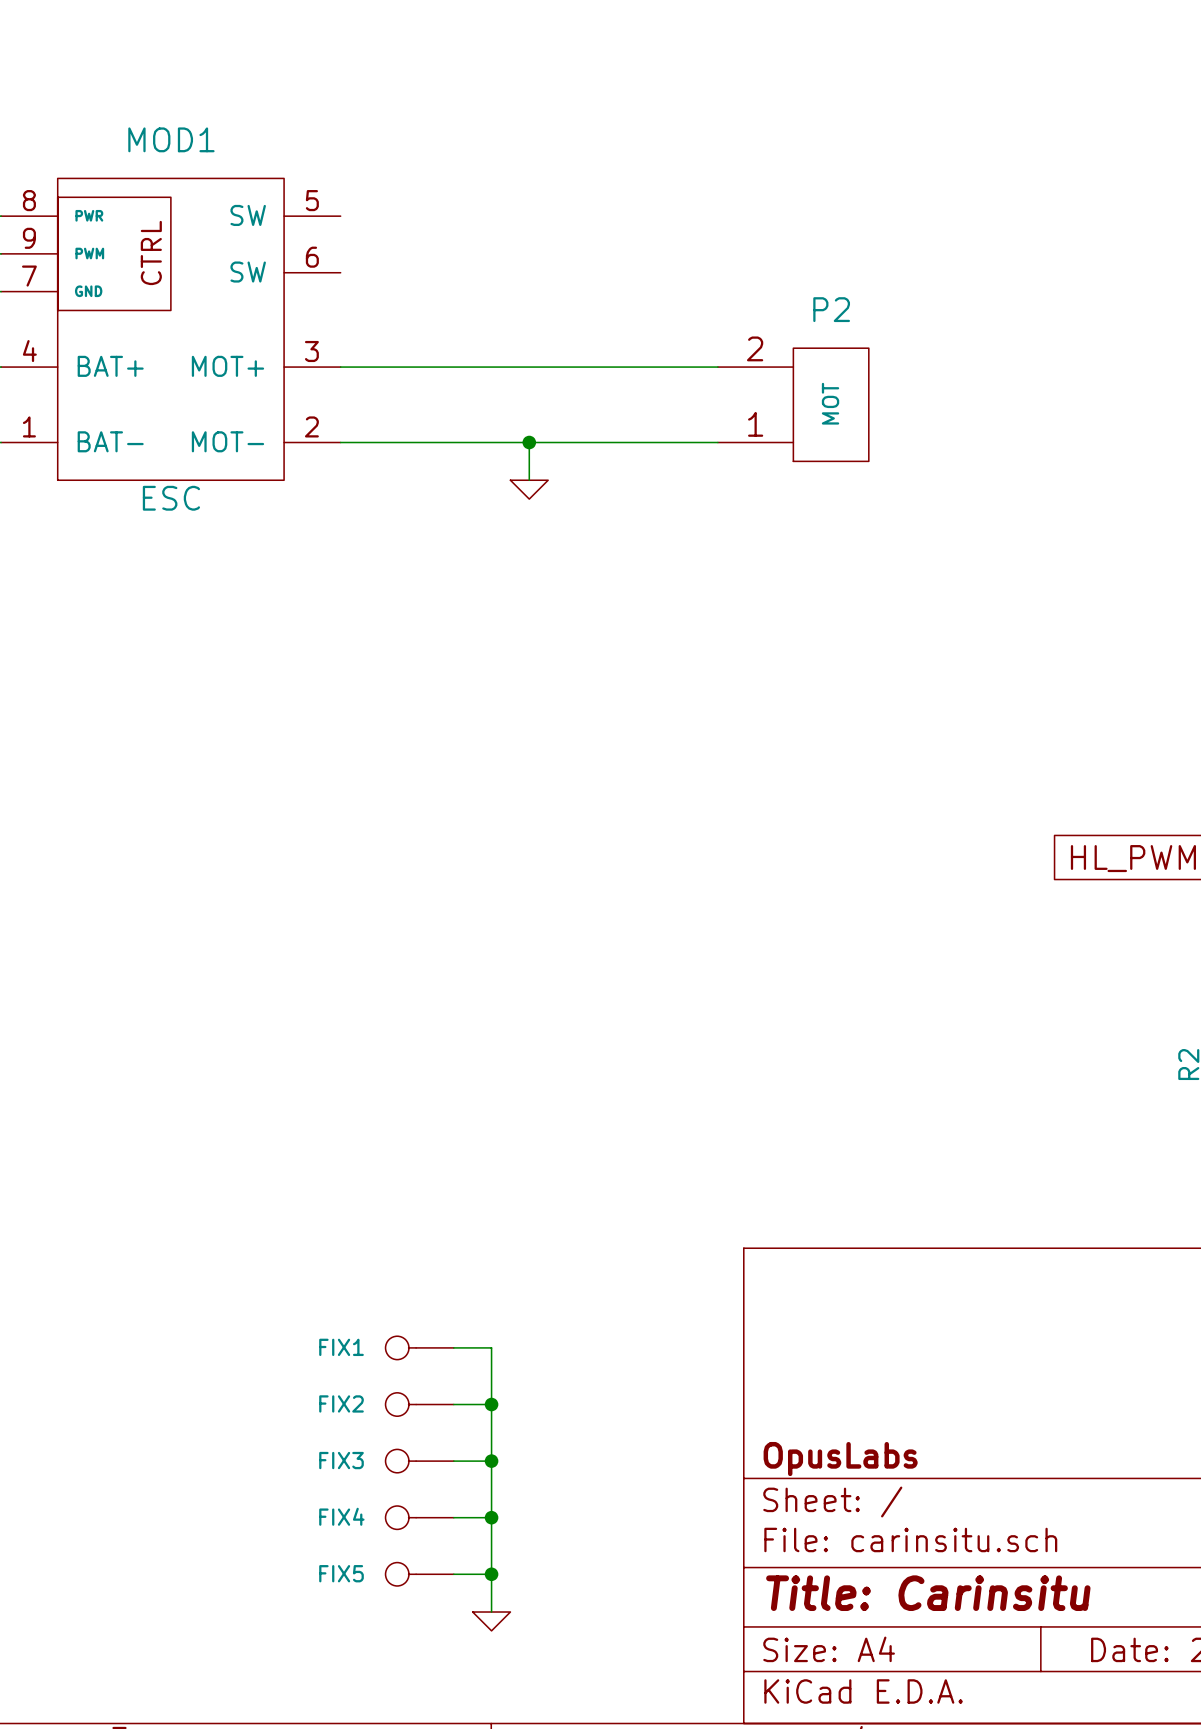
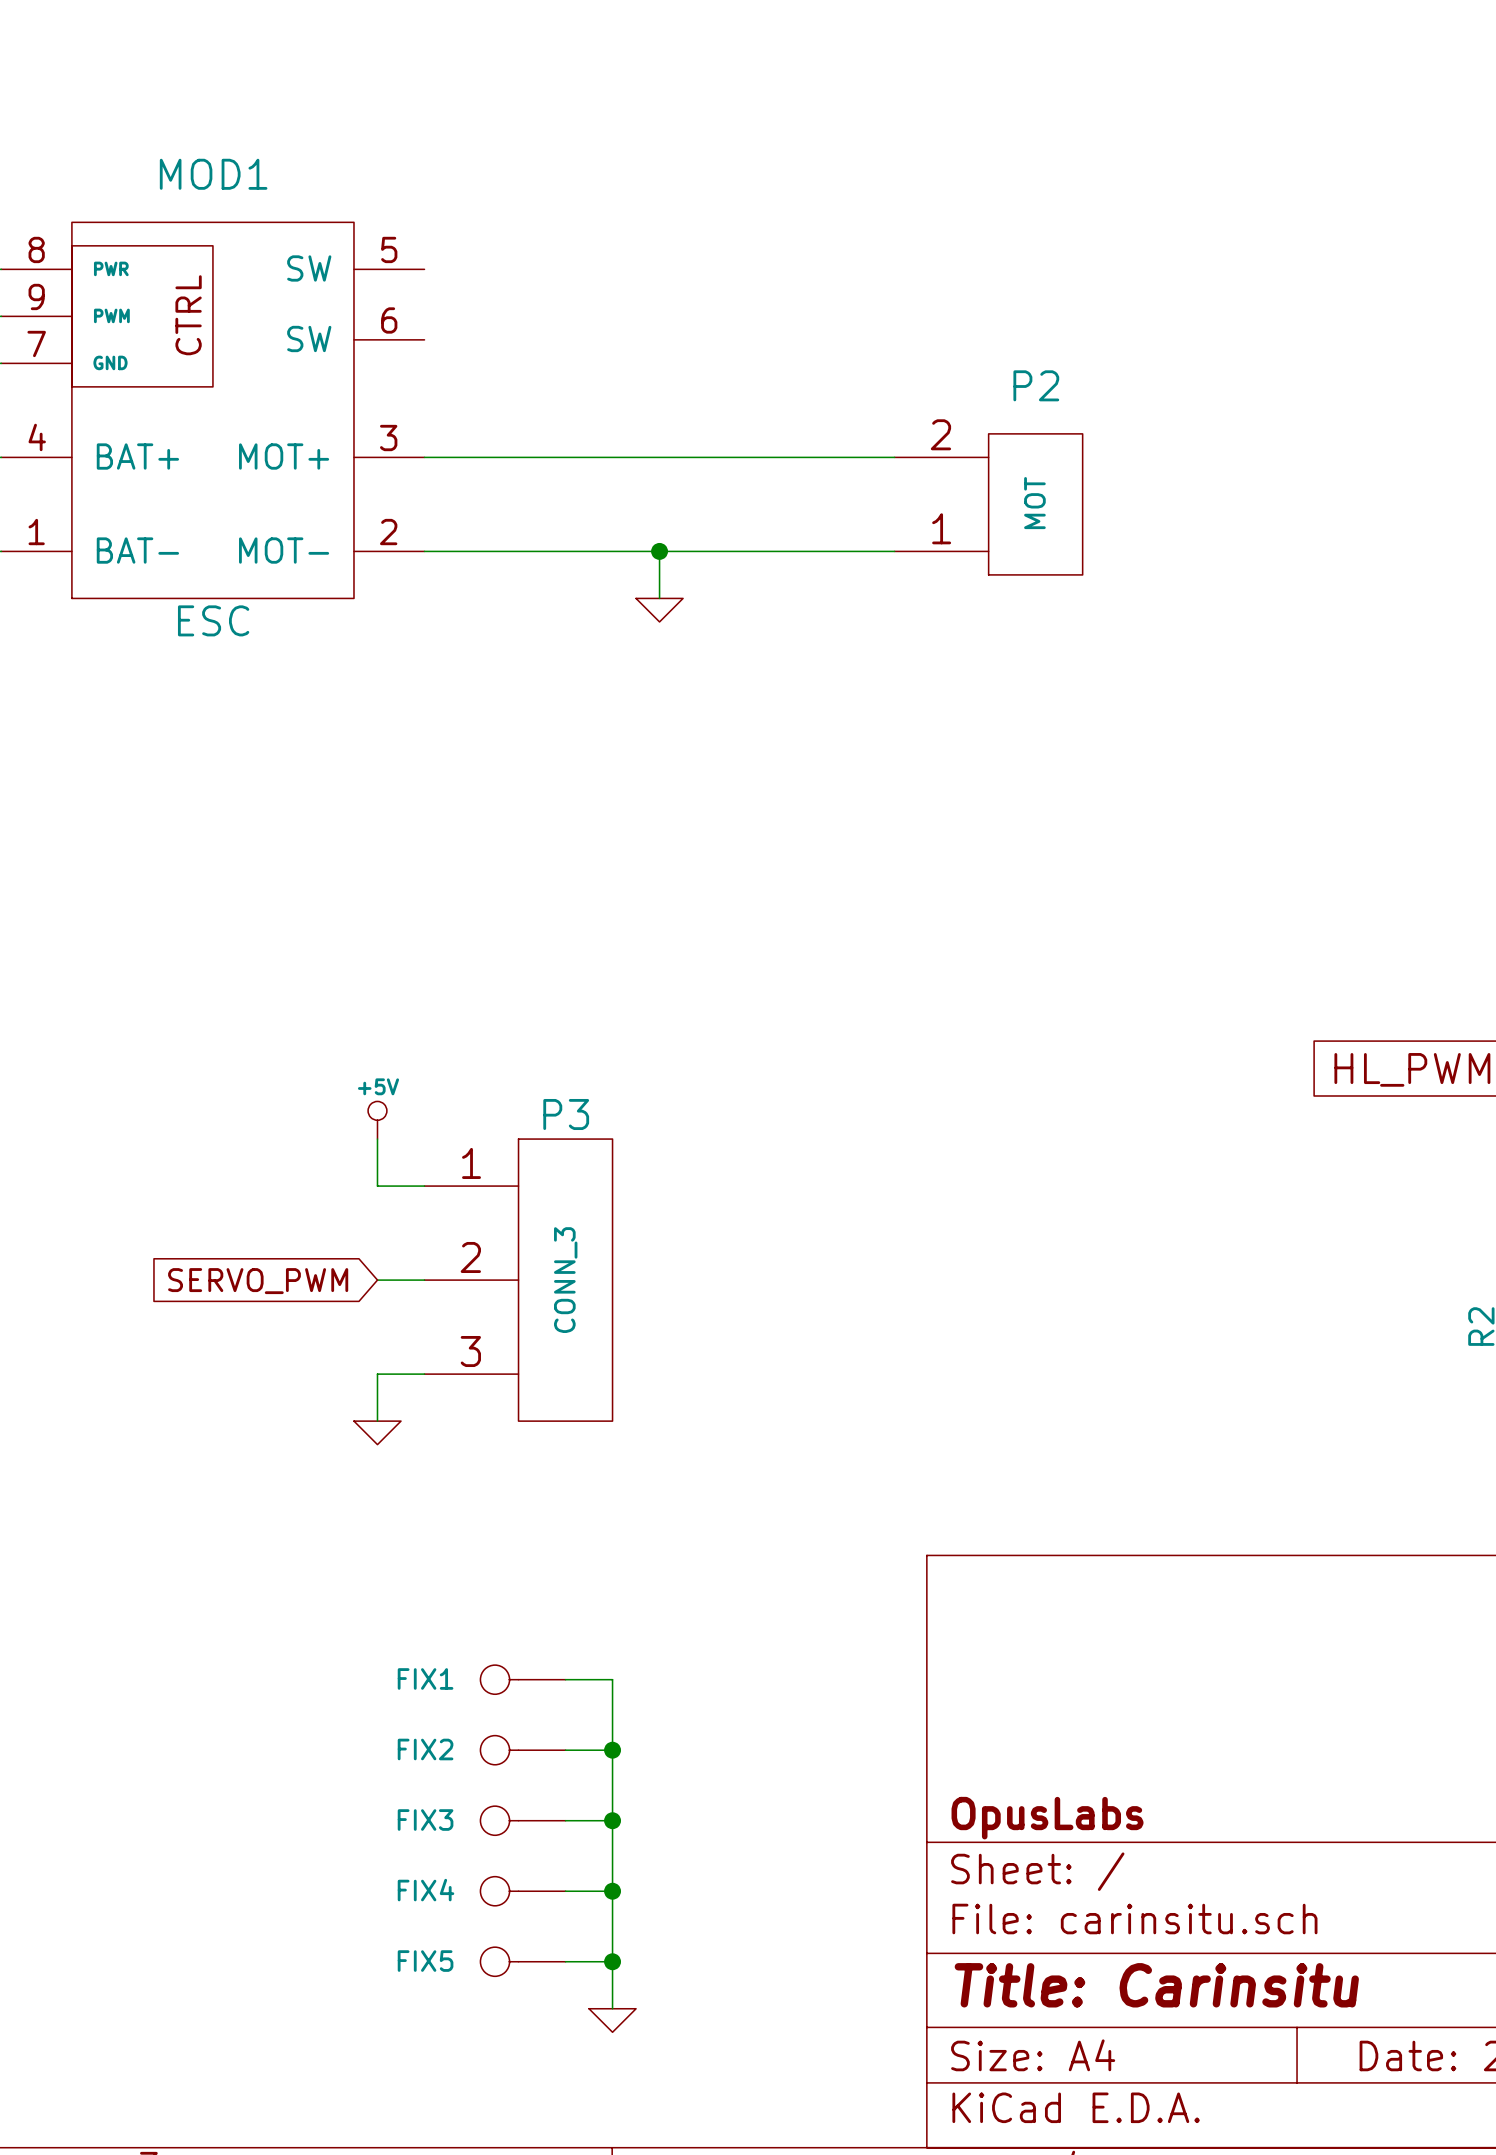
power symbol: none -> +5V (377, 1120)
wire: none -> (377, 1139) (377, 1186) (424, 1186)
wire: none -> (377, 1280) (424, 1280)
P3: none -> CONN_3 (518, 1280)
global label: none -> SERVO_PWM (258, 1281)
wire: none -> (424, 1374) (377, 1374) (377, 1421)
power symbol: none -> (377, 1432)

